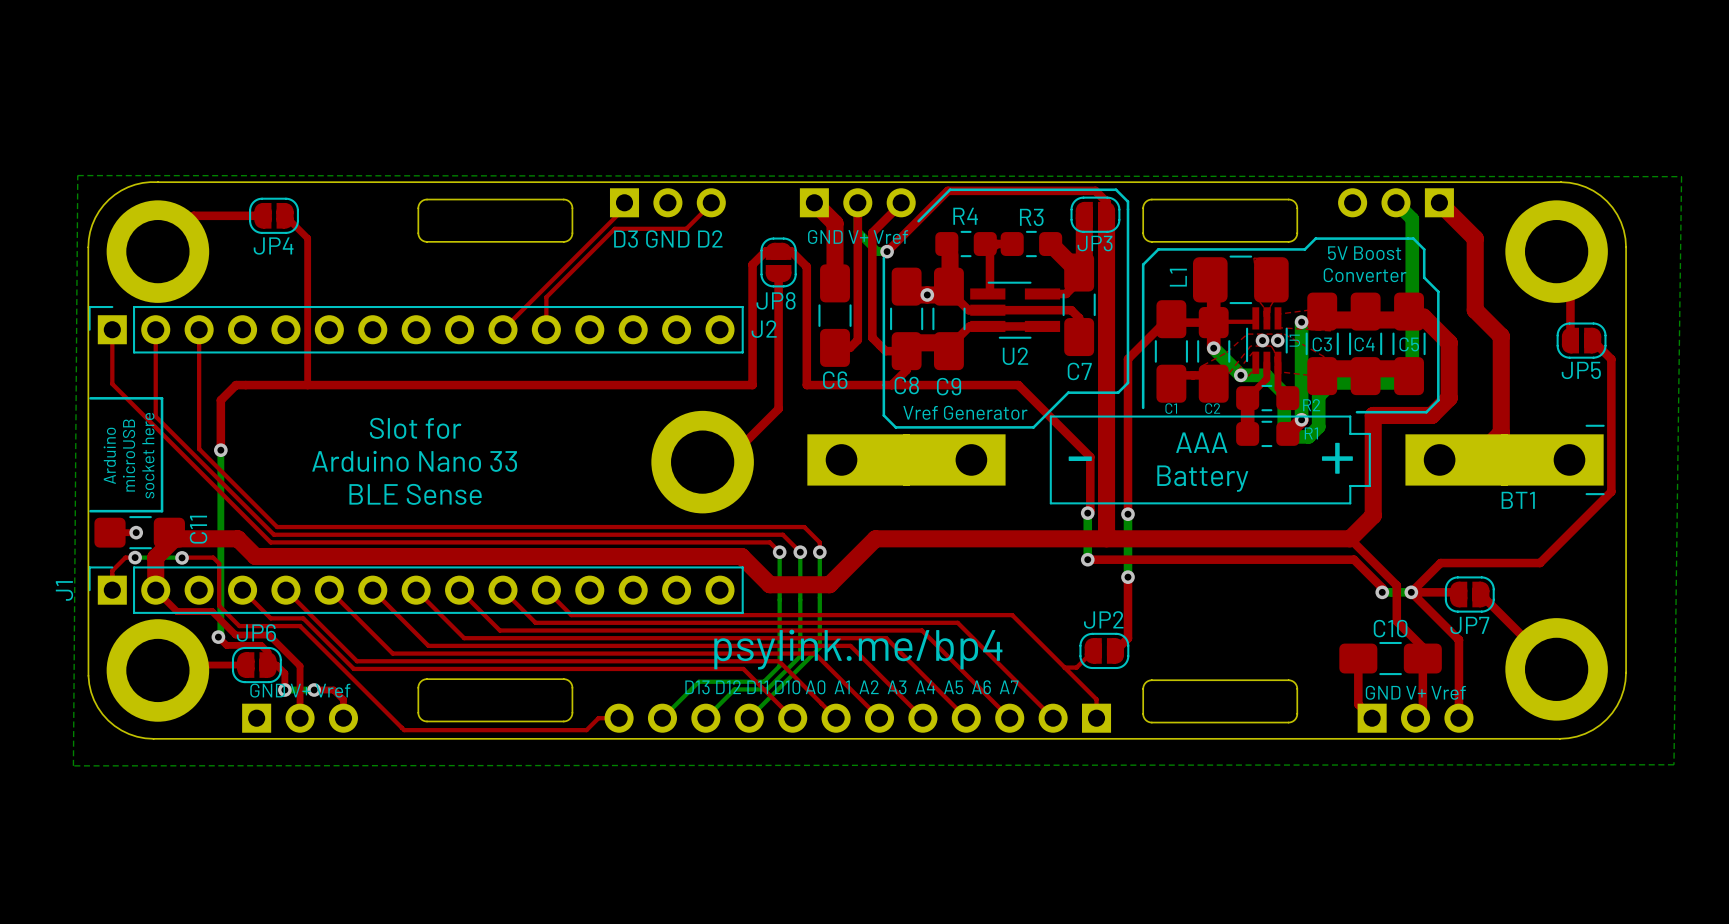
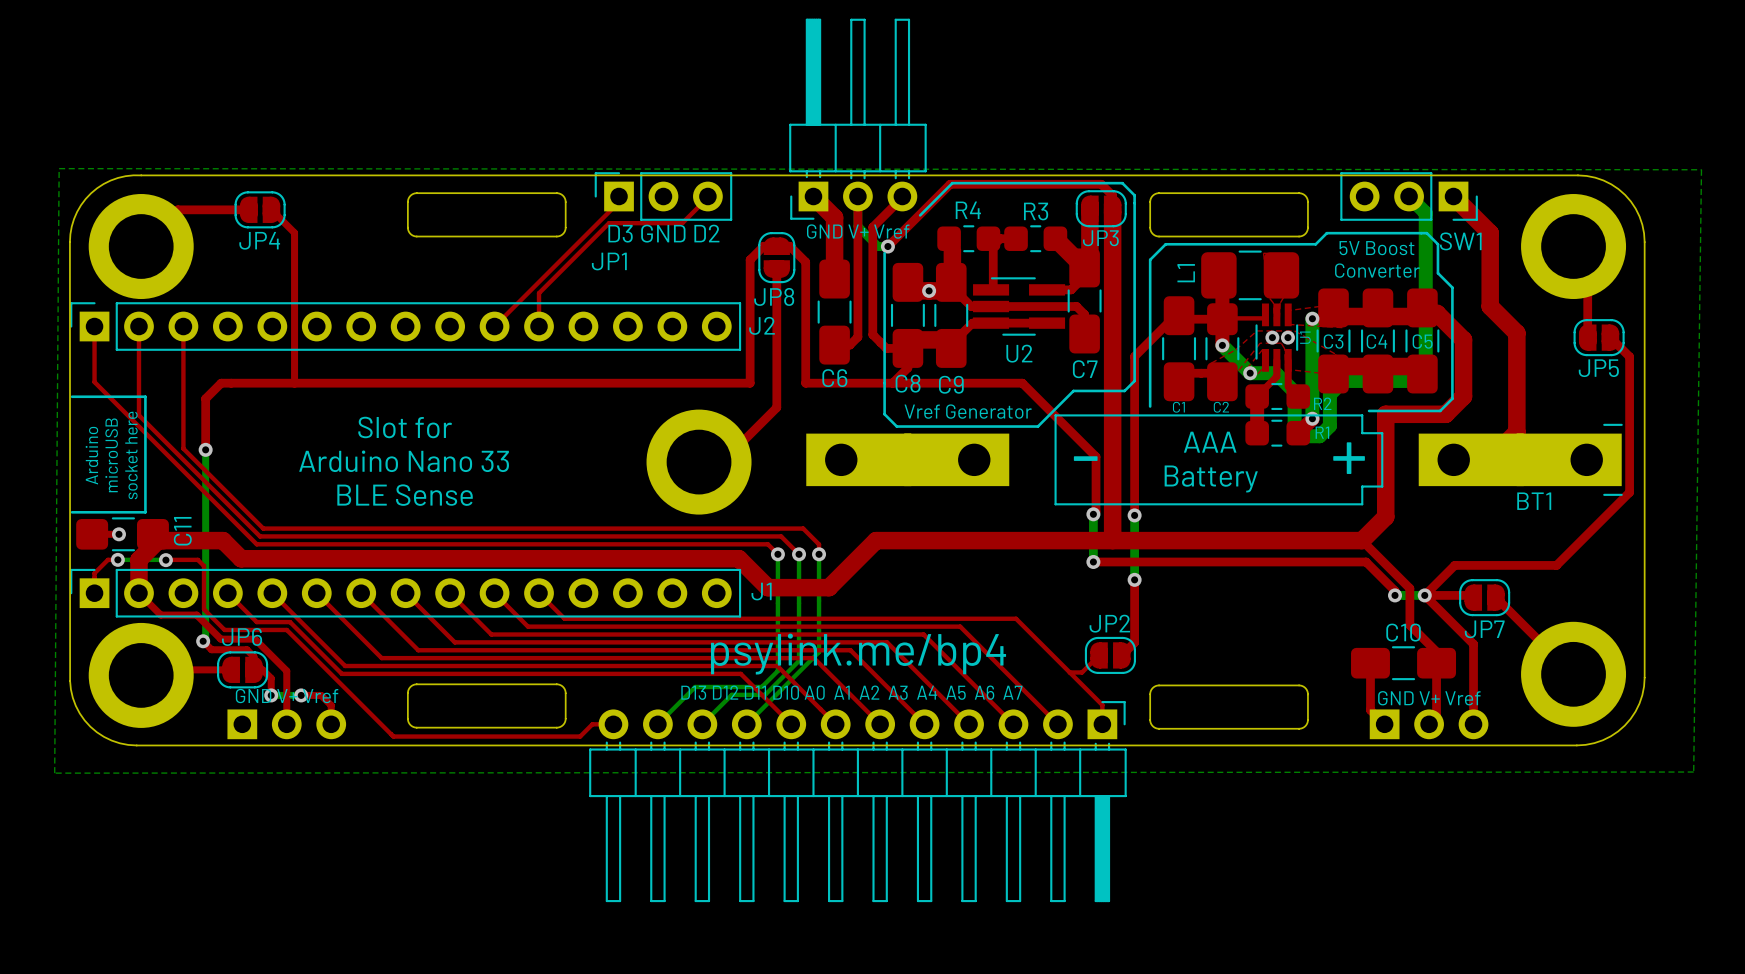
JP1 side: bottom (667, 202) -> top (663, 196)
part side: bottom (857, 202) -> top (857, 119)
SW1 side: bottom (1396, 202) -> top (1409, 196)
J1 name rotation: 0° (64, 590) -> 90° clockwise (761, 591)
J1 name position: J1 (64, 590) -> J1 (761, 591)
part side: bottom (857, 718) -> top (857, 801)

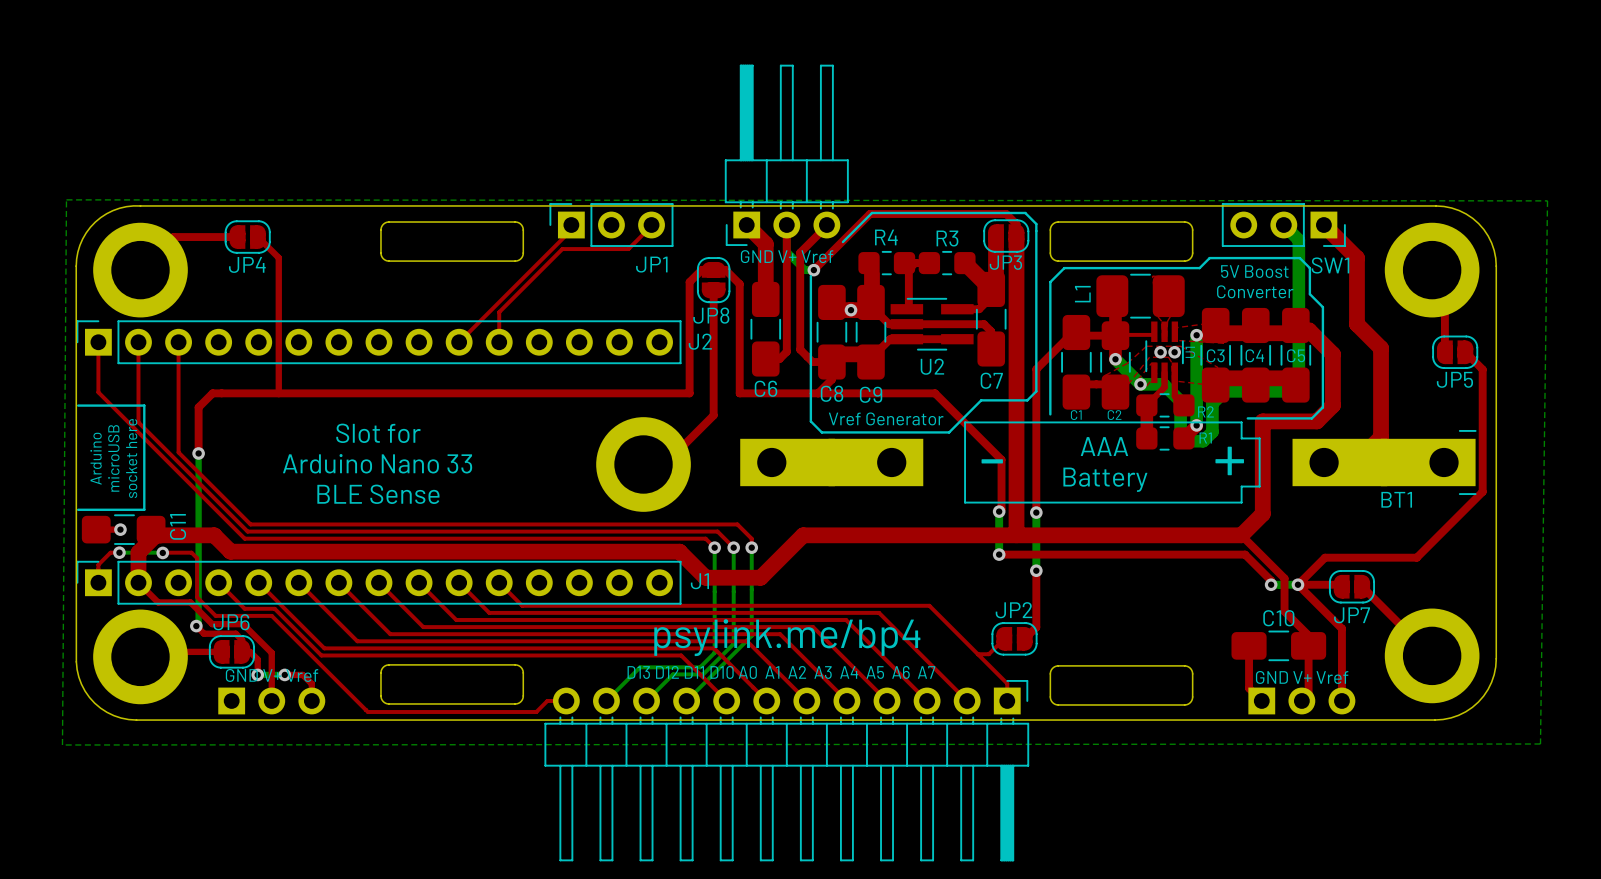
text: D3 GND D2 (663, 233) -> none
JP1 name position: JP1 (609, 261) -> JP1 (651, 264)

